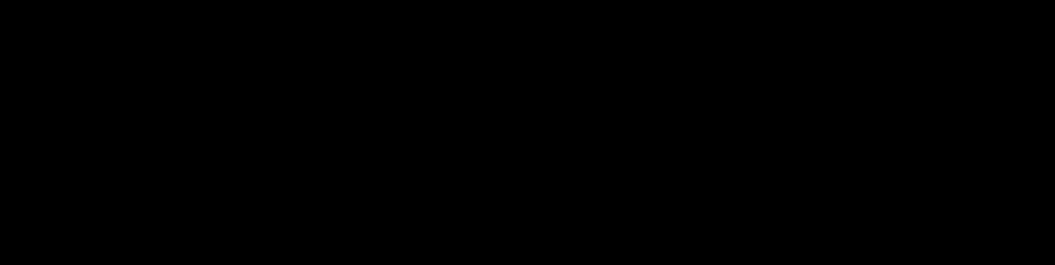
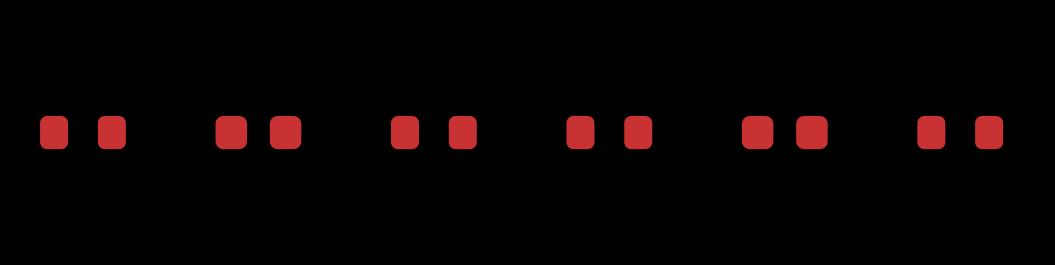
part: none -> (82, 132)
part: none -> (258, 132)
part: none -> (433, 132)
part: none -> (609, 132)
part: none -> (784, 132)
part: none -> (960, 132)

